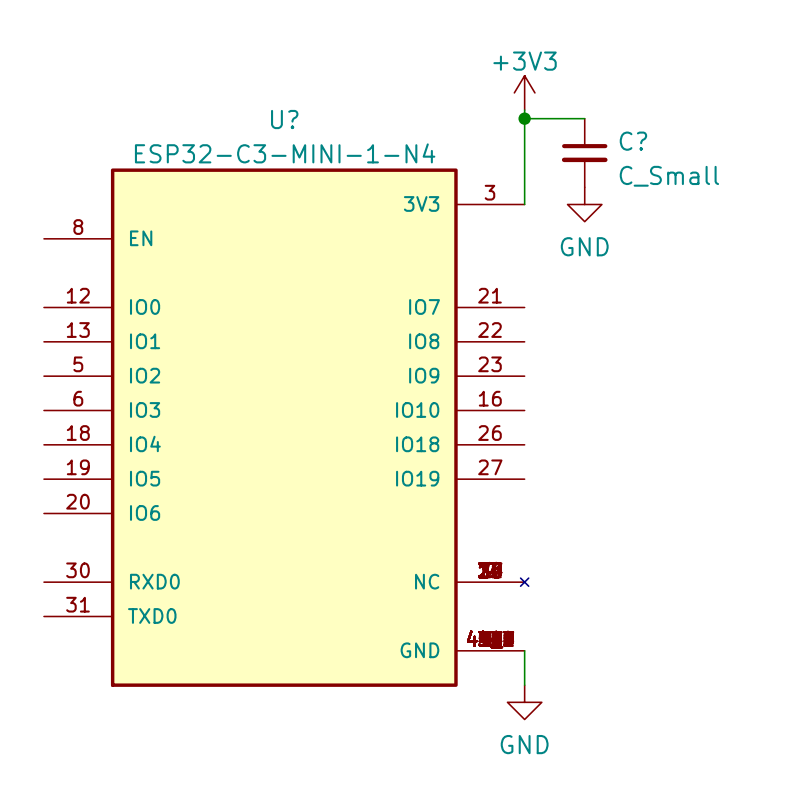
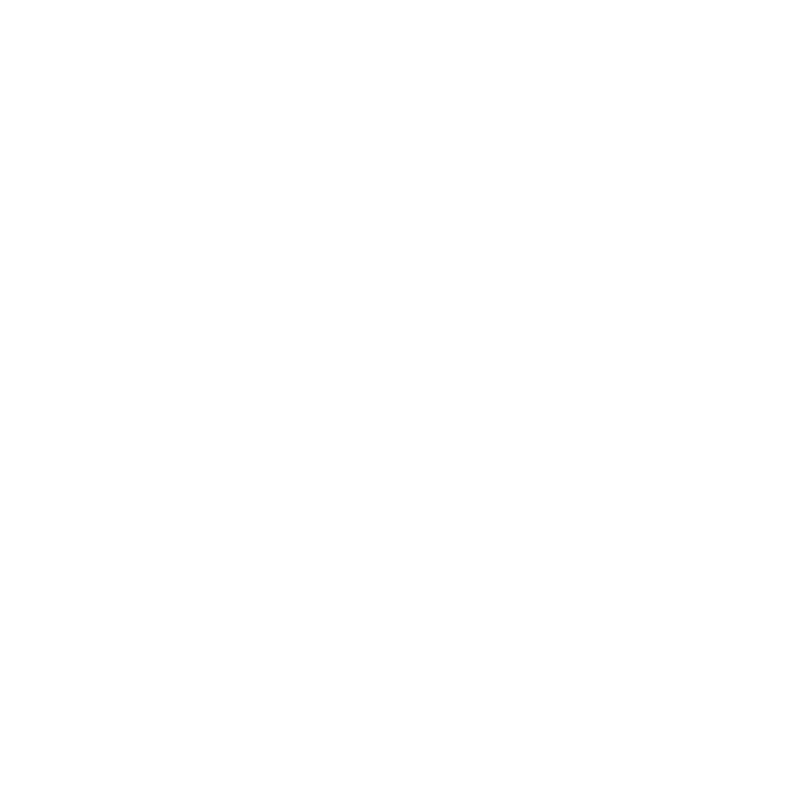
power symbol: +3V3 (524, 92) -> none
wire: (524, 110) (524, 204) -> none
wire: (524, 118) (584, 118) -> none
junction: (524, 118) -> none
C?: C_Small (584, 153) -> none
power symbol: GND (584, 204) -> none
U?: ESP32-C3-MINI-1-N4 (286, 427) -> none
wire: (524, 650) (524, 685) -> none
power symbol: GND (524, 702) -> none

